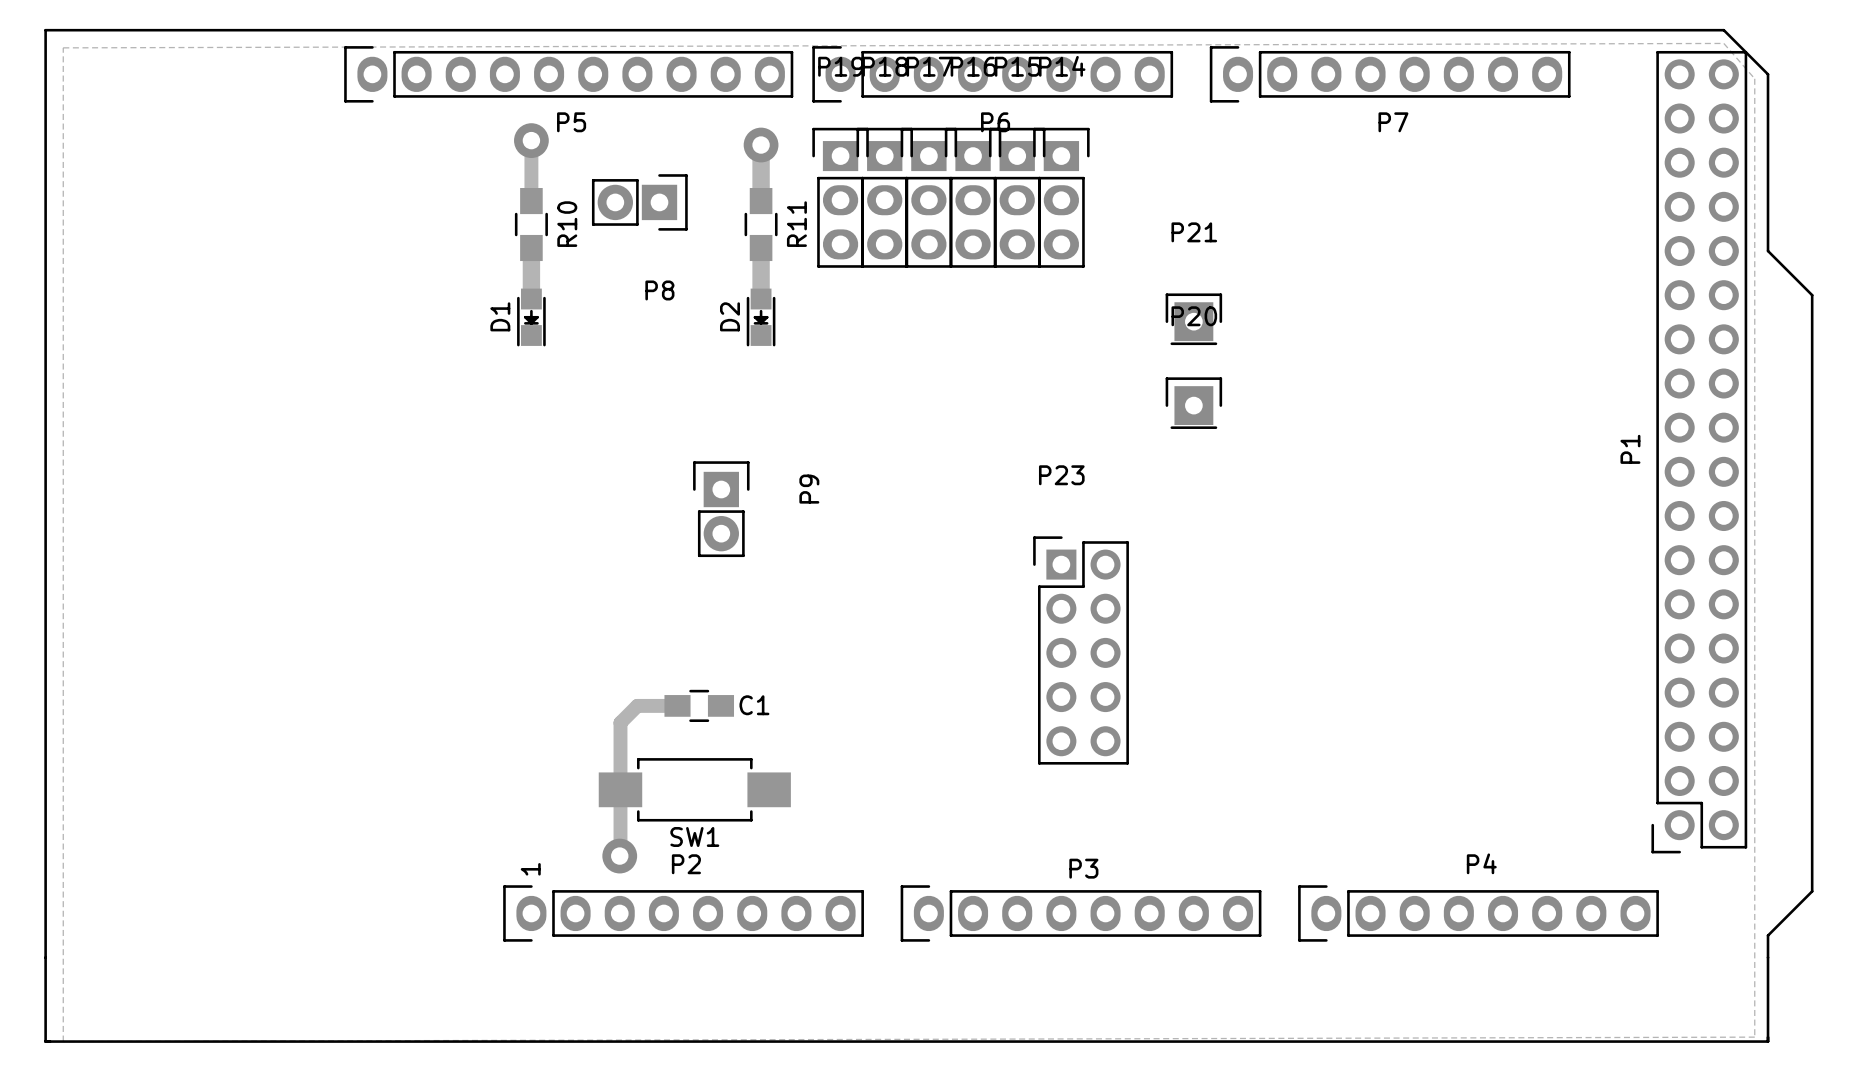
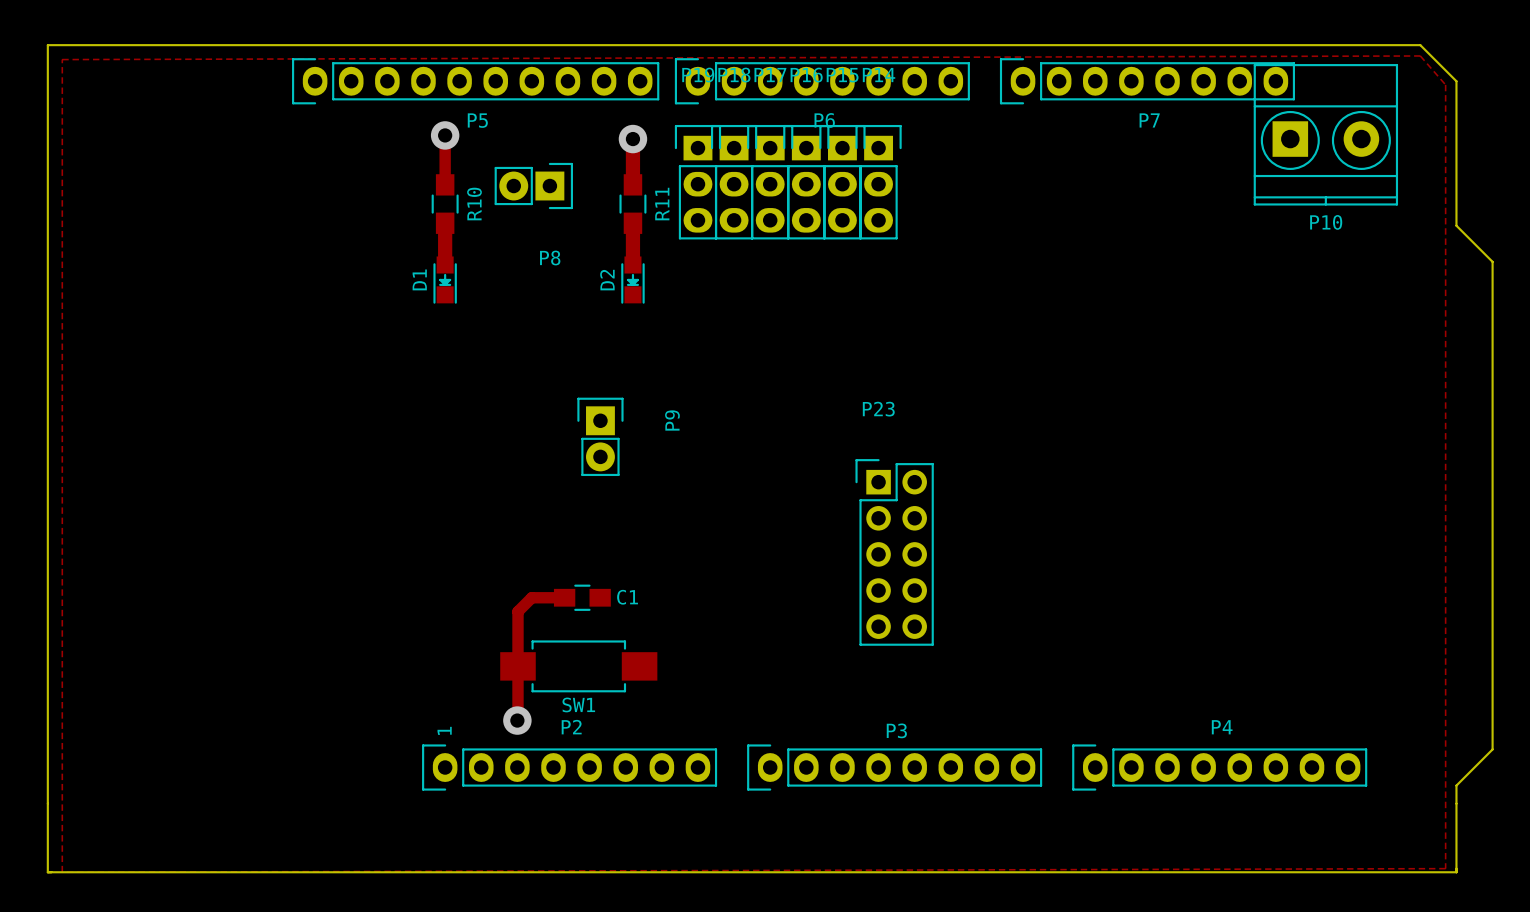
P10: none -> (1325, 134)
P21: (1193, 319) -> none
P20: (1193, 403) -> none
P1: (1699, 452) -> none

